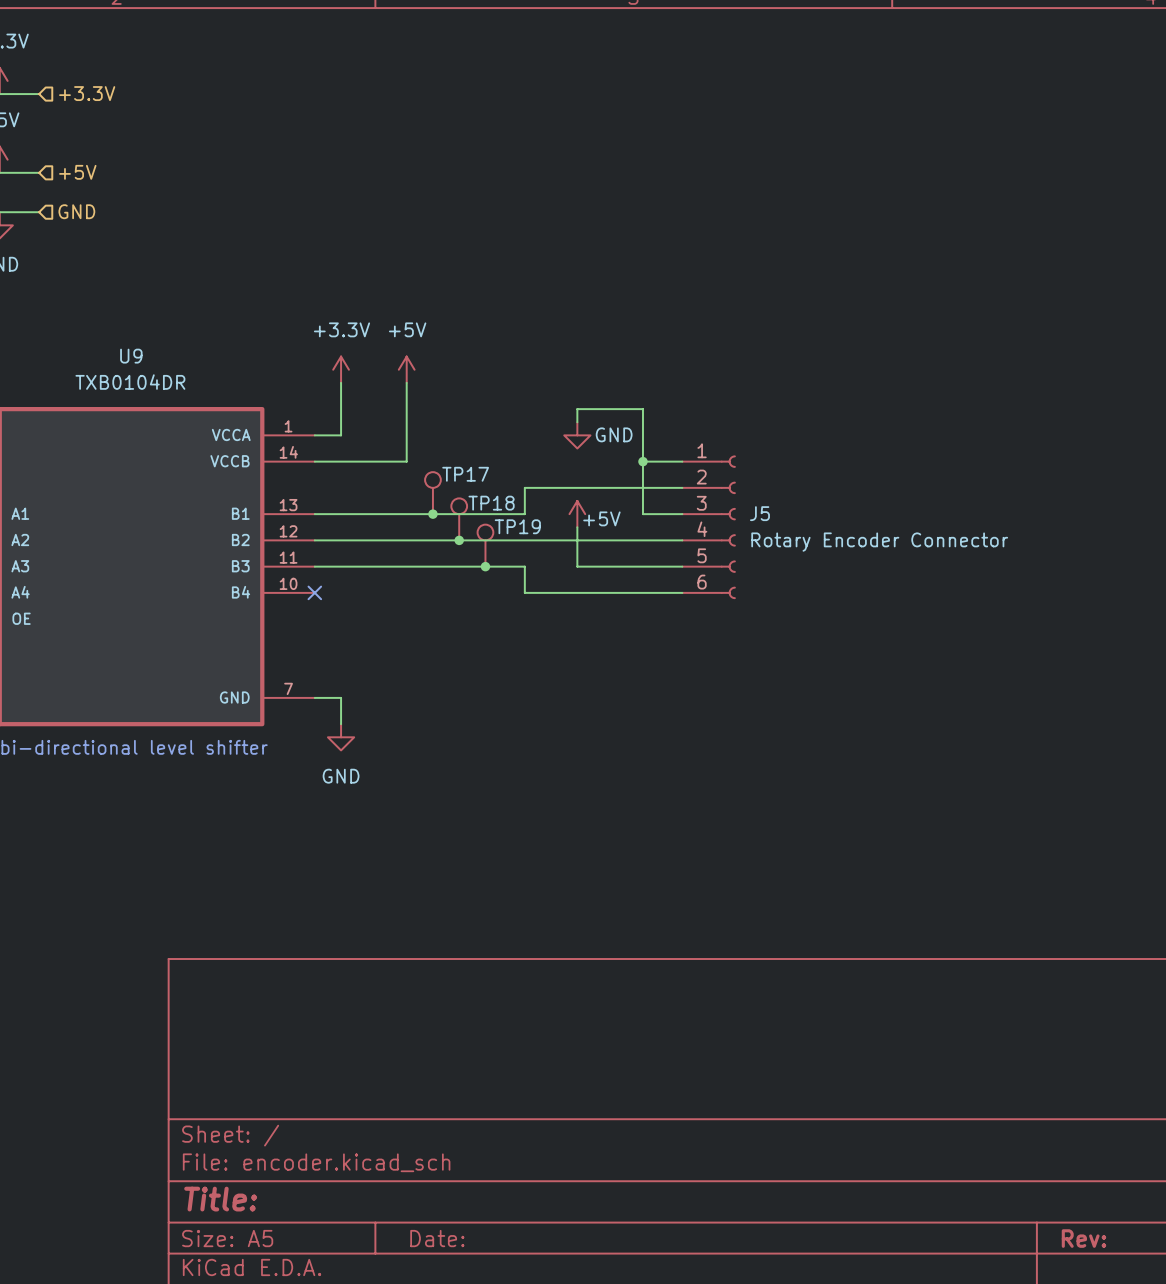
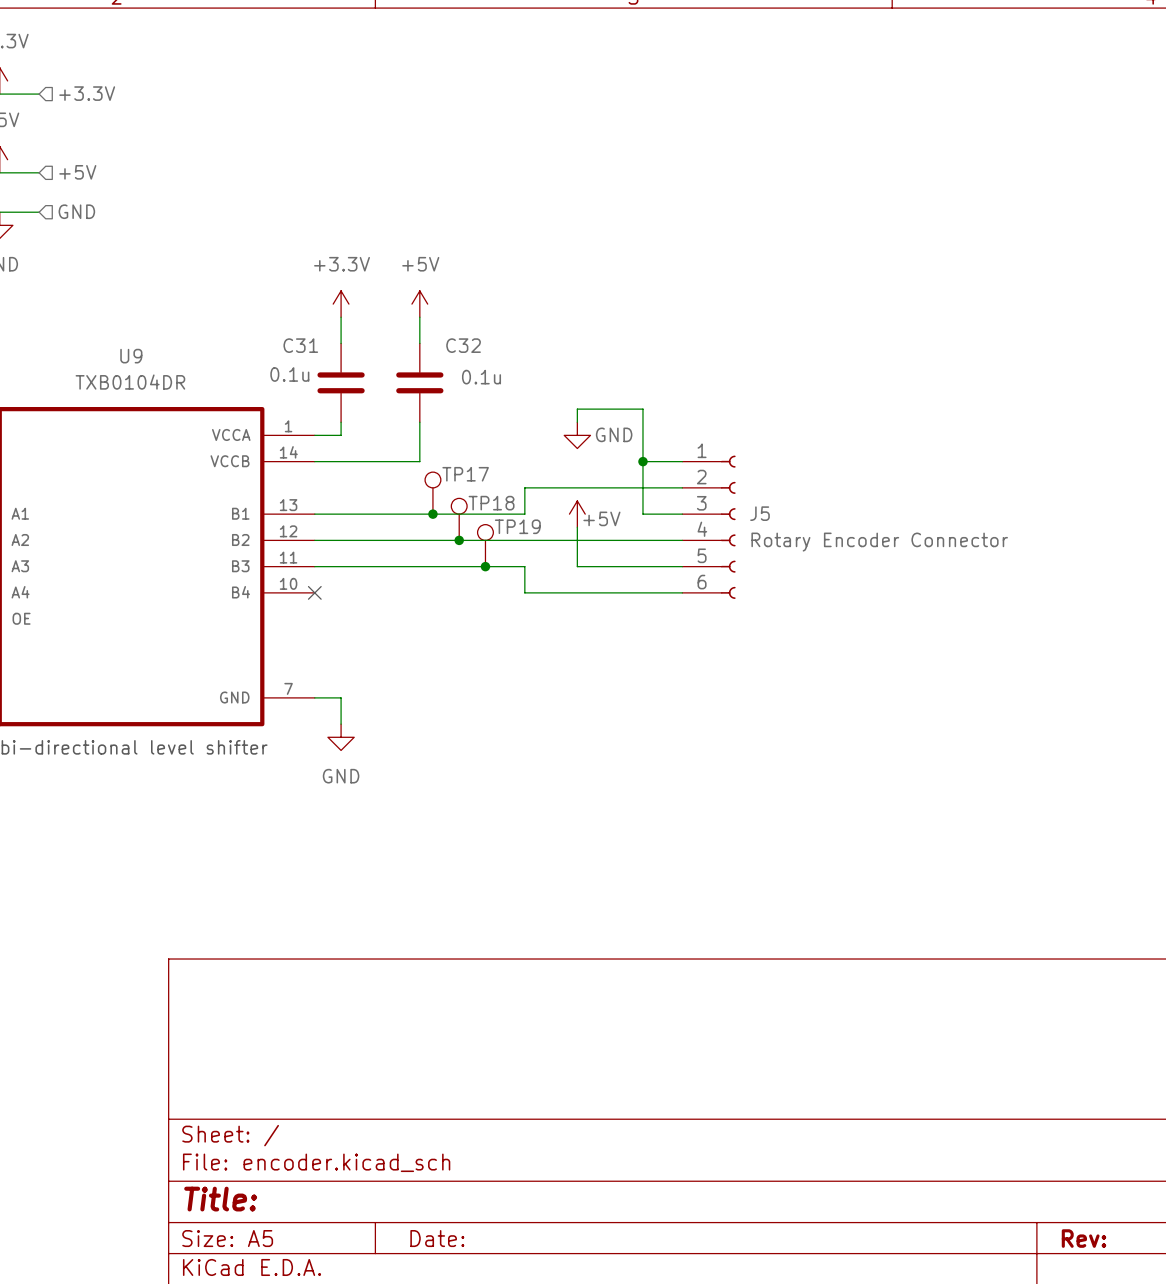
wire: none -> (341, 317) (341, 343)
wire: none -> (419, 317) (419, 343)
power symbol position: +3.3V (341, 369) -> +3.3V (341, 304)
power symbol position: +5V (406, 369) -> +5V (419, 304)
C31: none -> 0.1u (341, 382)
wire: (406, 382) (406, 461) -> (419, 422) (419, 461) (406, 461)
C32: none -> 0.1u (419, 382)

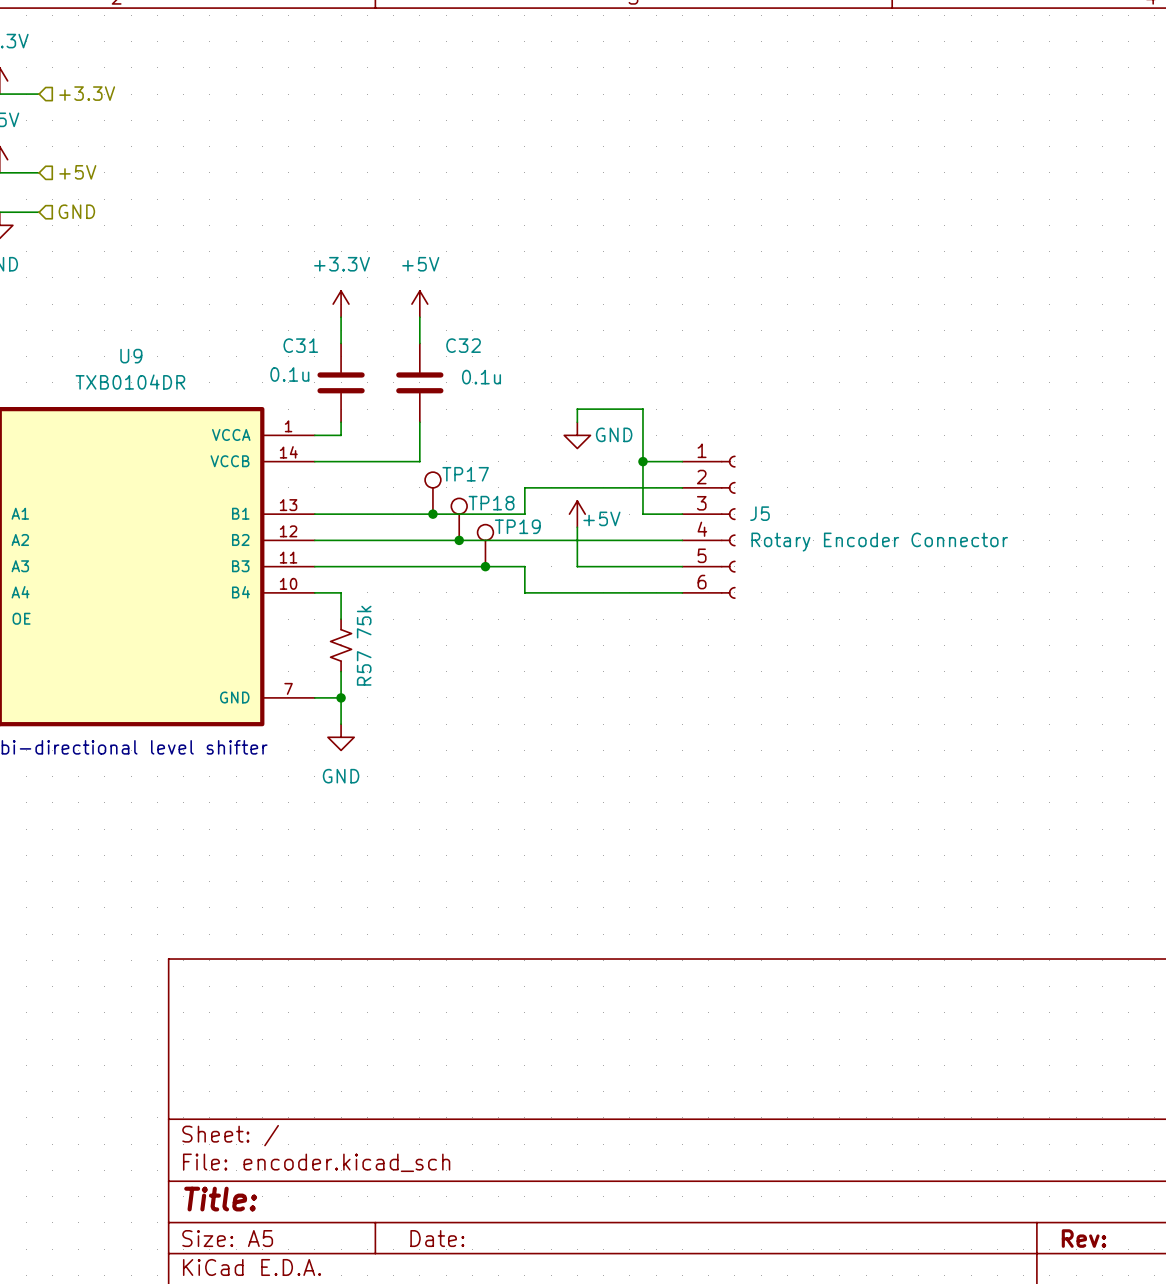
wire: none -> (314, 592) (341, 592) (341, 619)
no-connect mark: (314, 592) -> none
R57: none -> 75k (341, 645)
wire: none -> (341, 671) (341, 697)
junction: none -> (341, 697)

